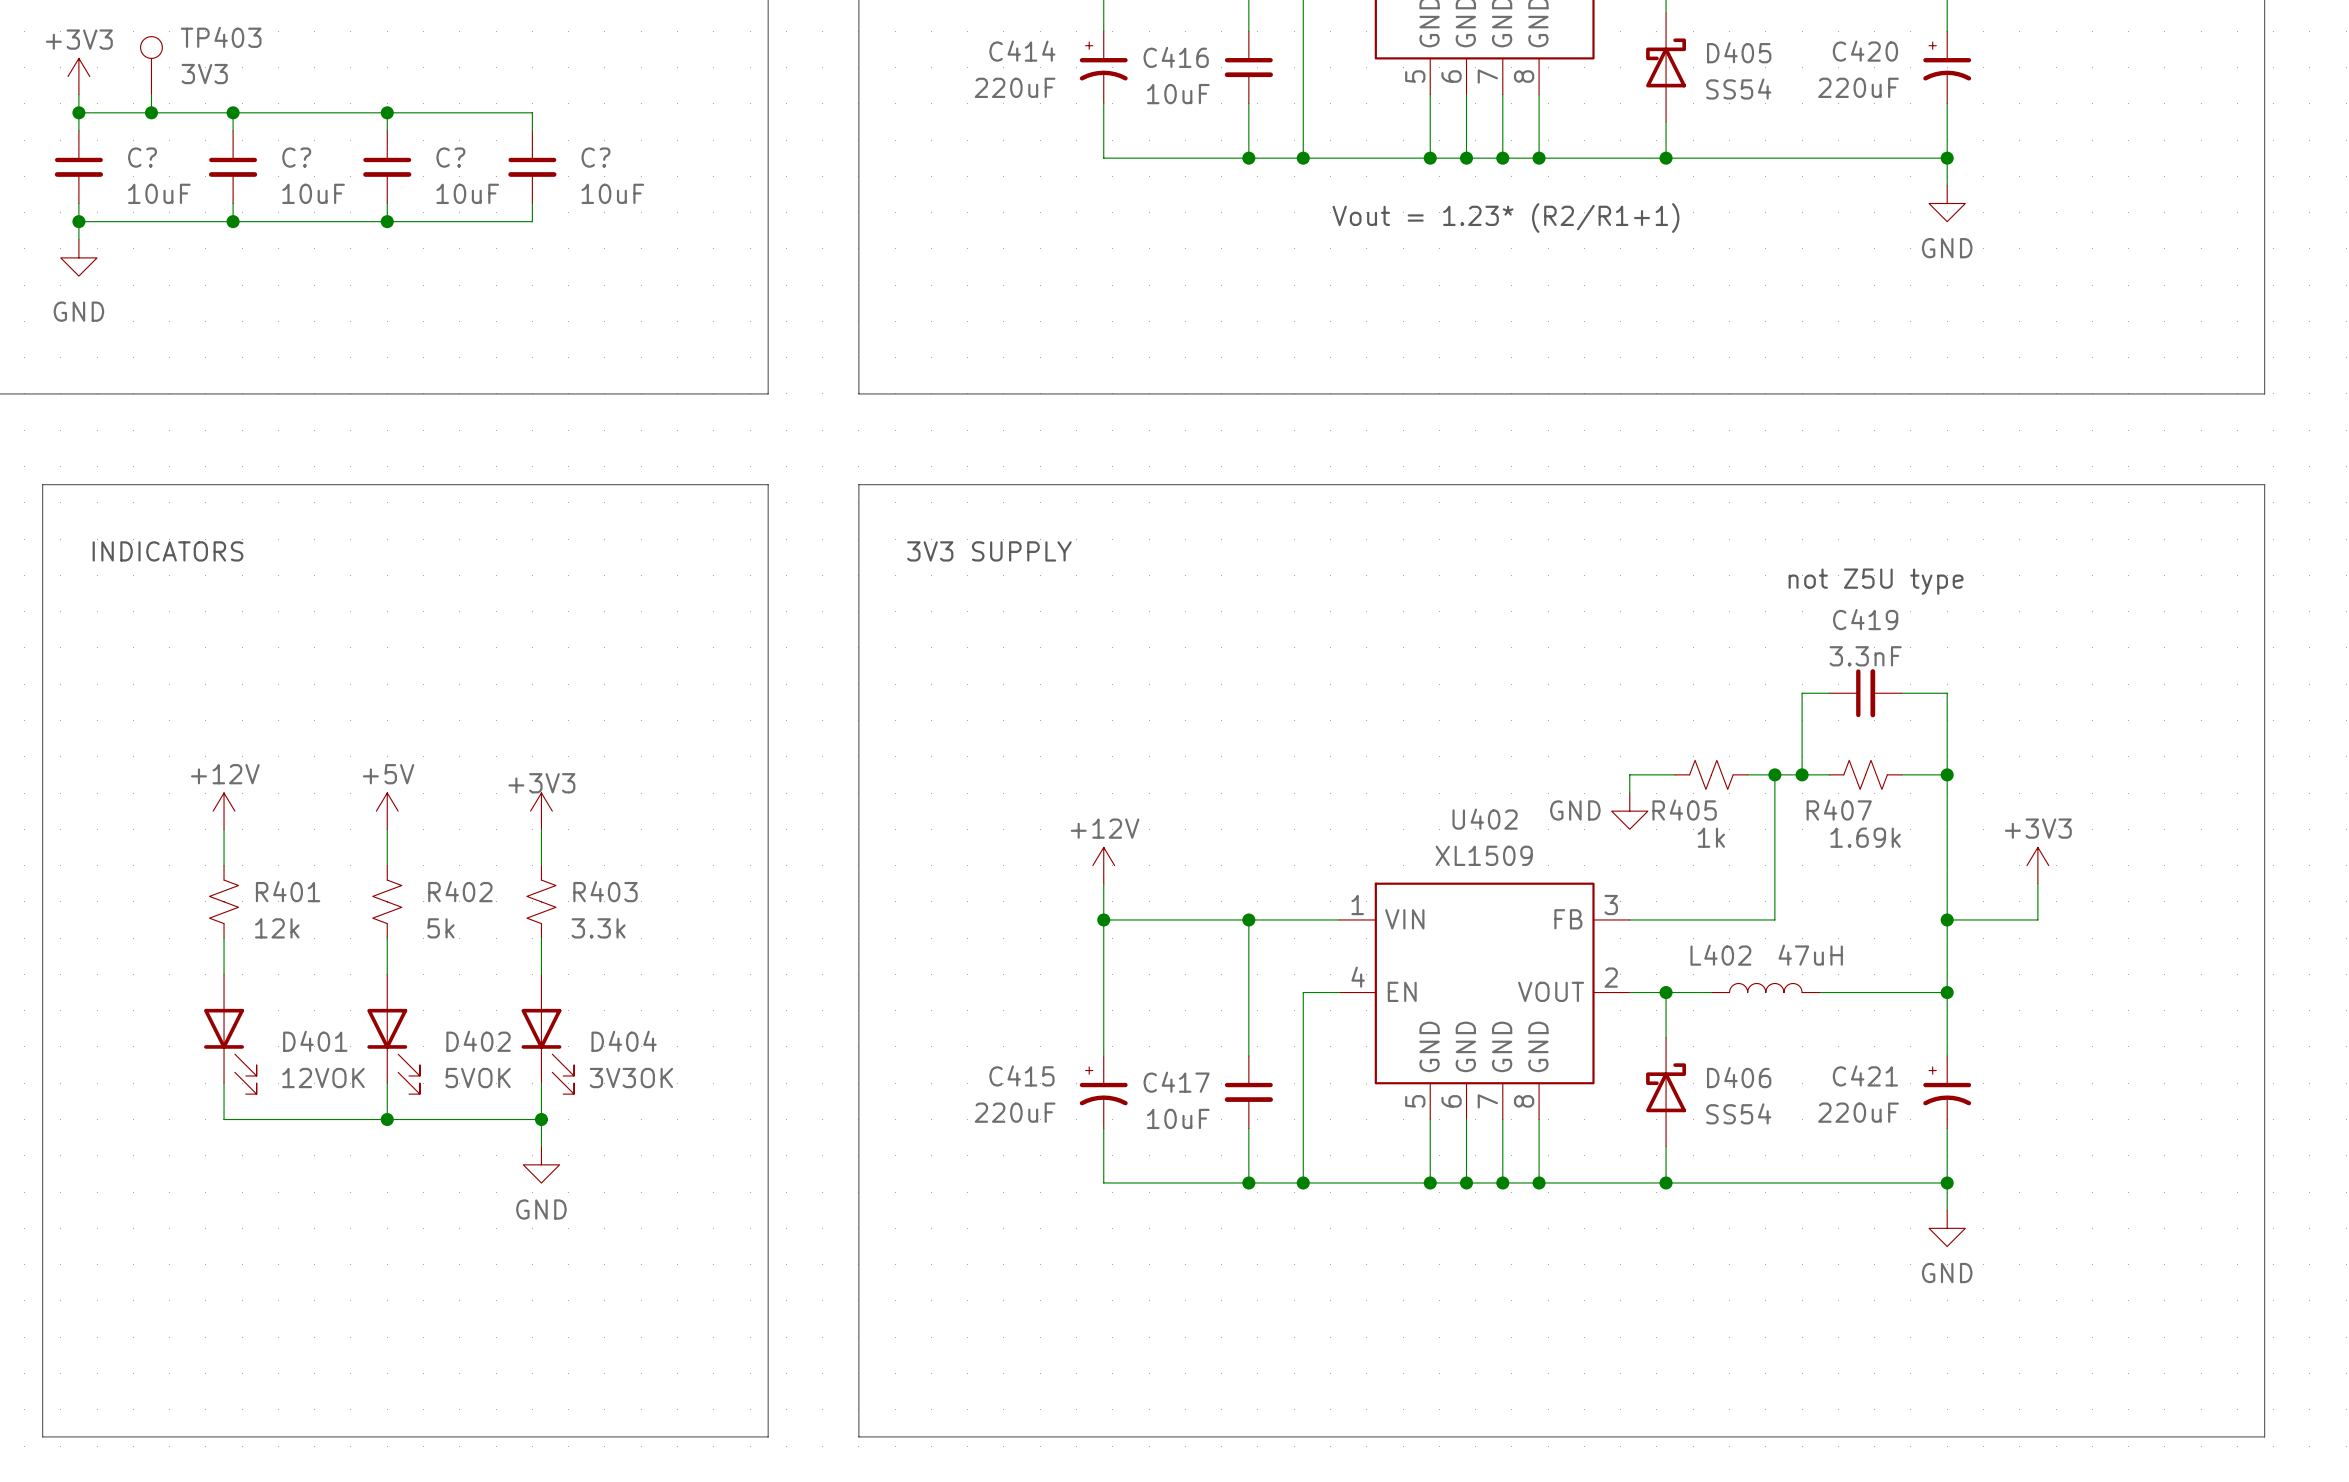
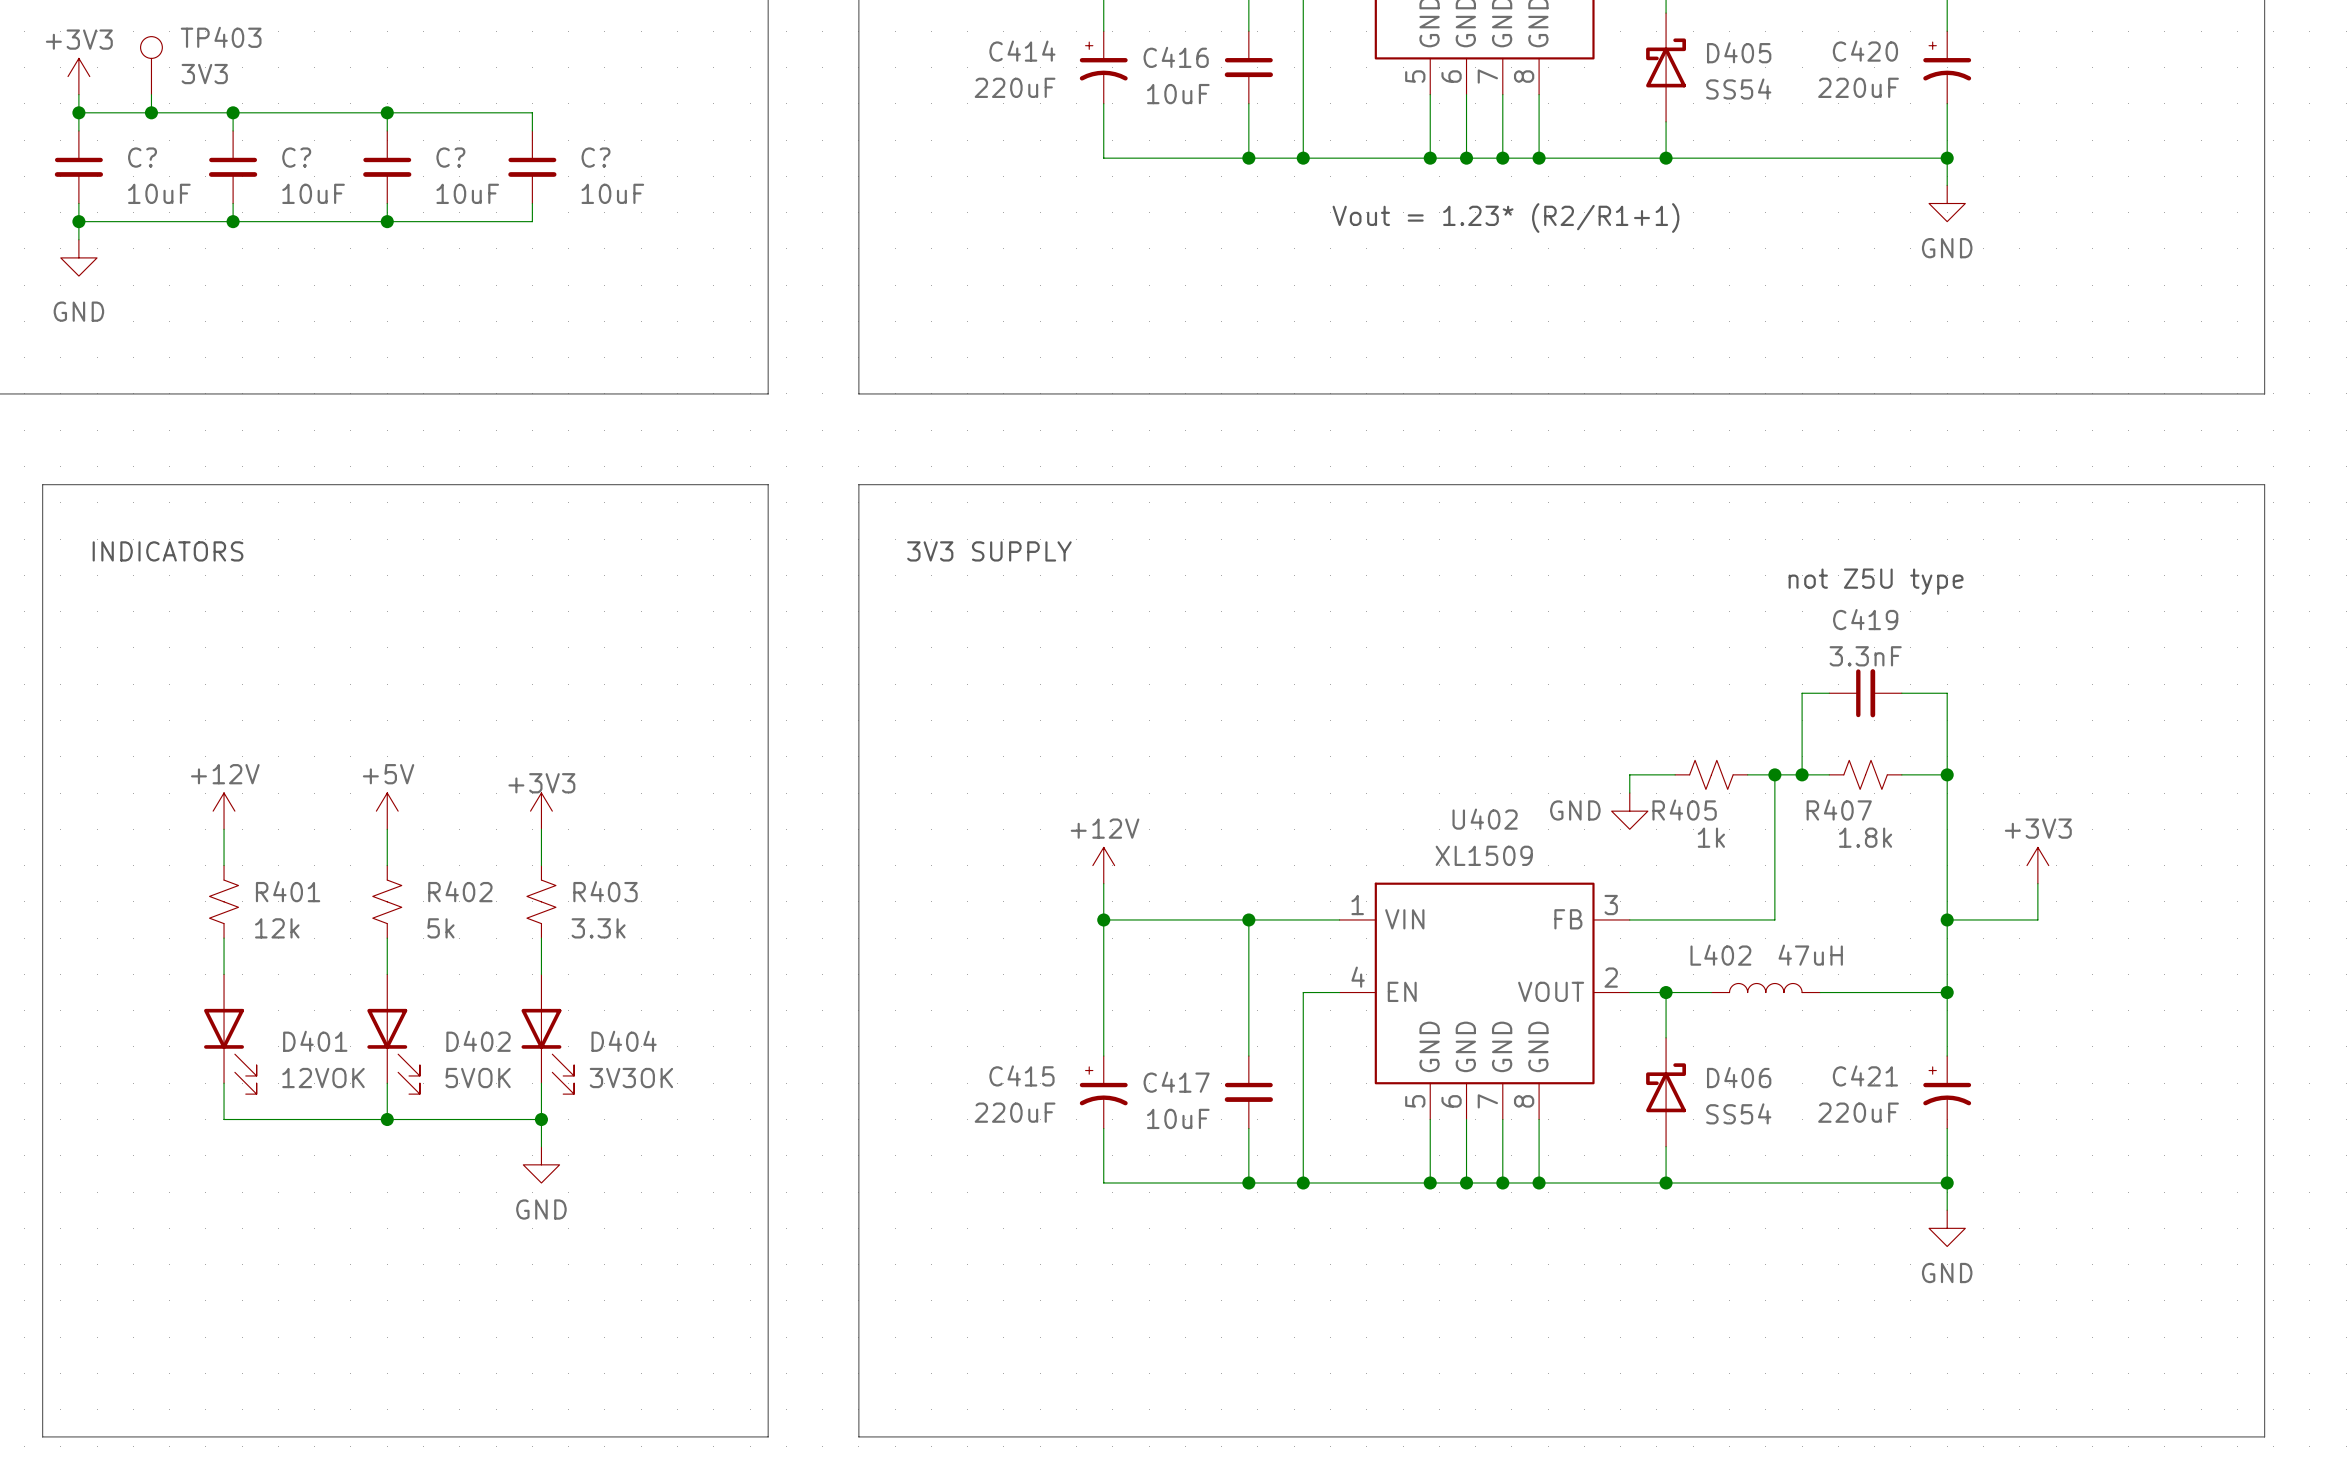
R407 value: 1.69k (1865, 837) -> 1.8k (1865, 837)

